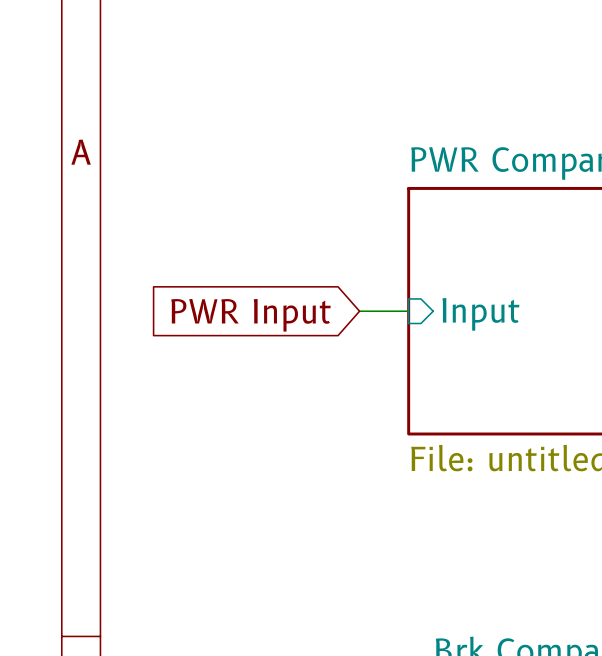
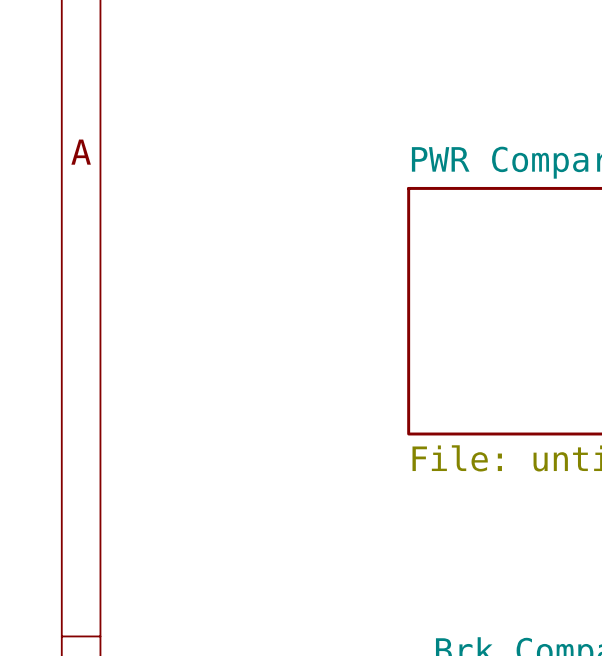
wire: (359, 311) (408, 311) -> none
sheet pin: Input (480, 314) -> none
global label: PWR Input (250, 315) -> none

